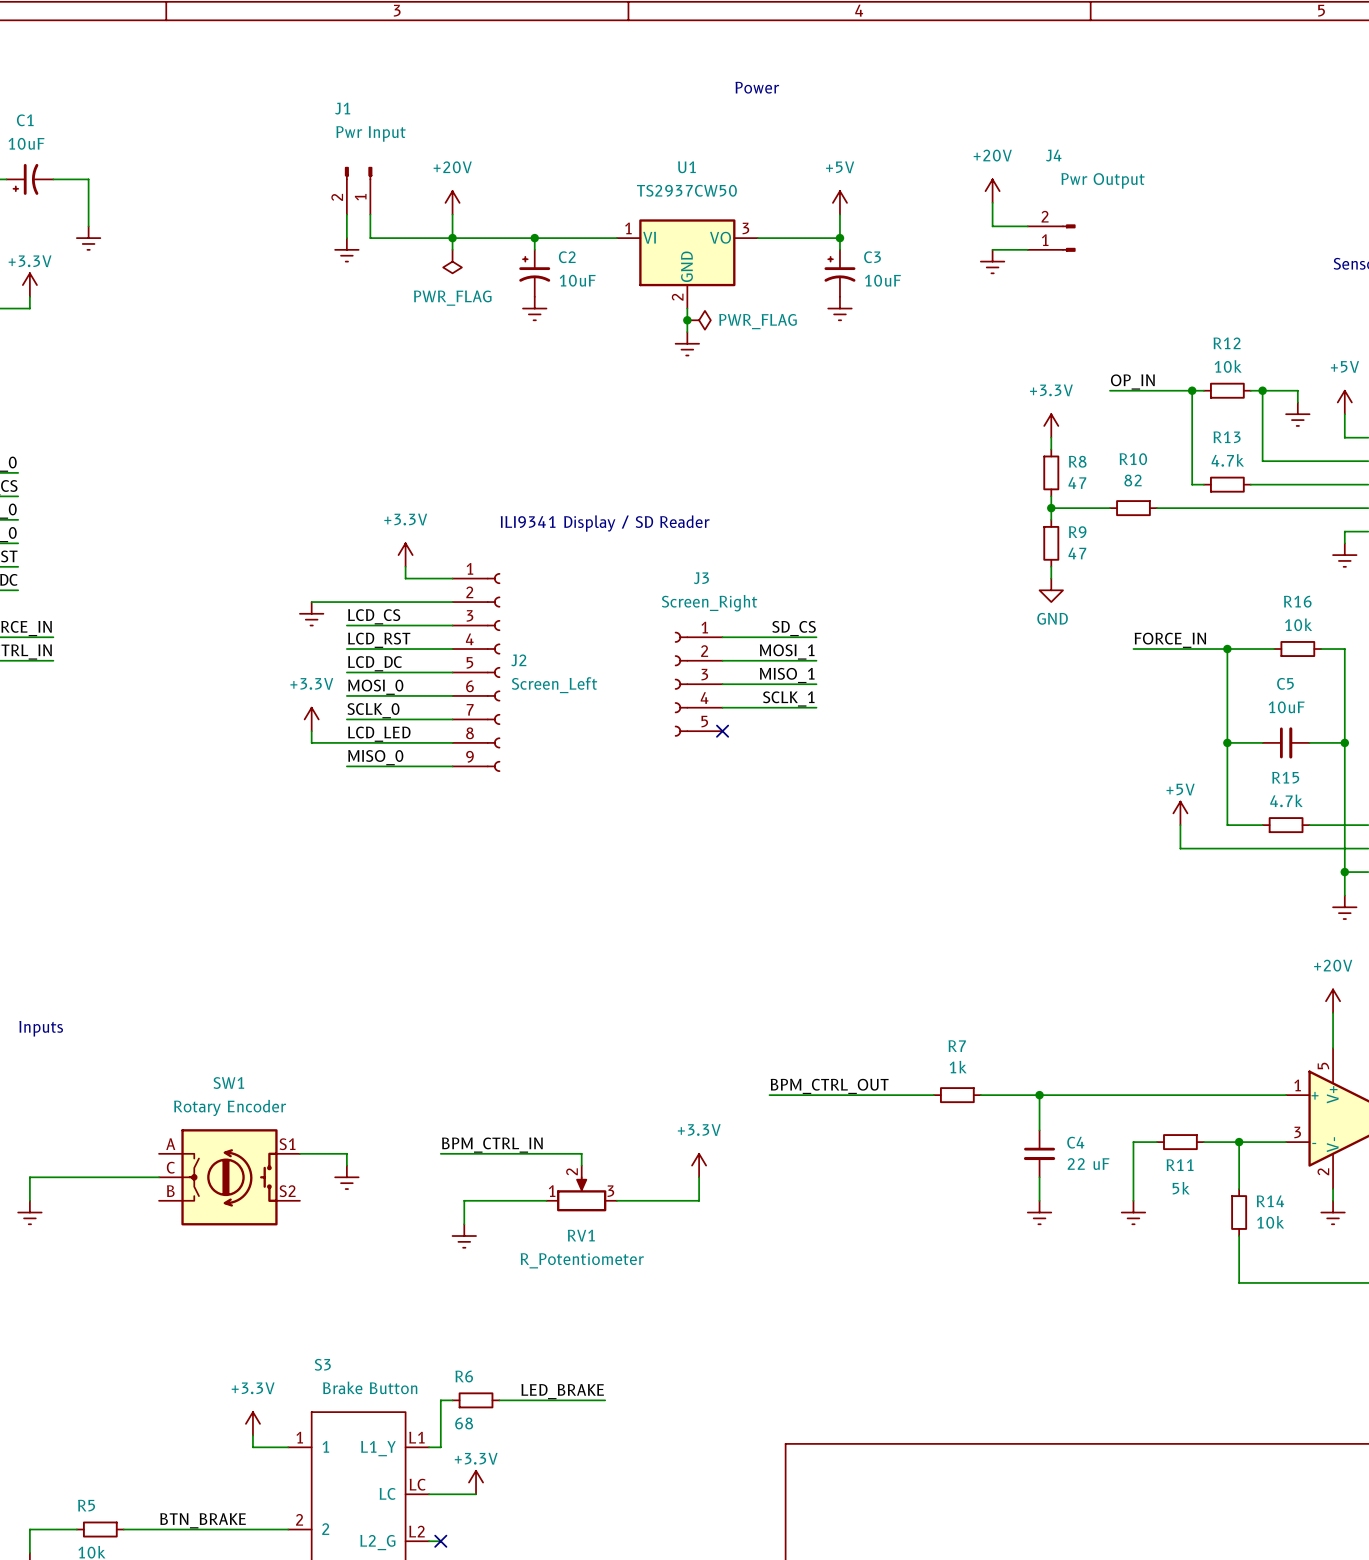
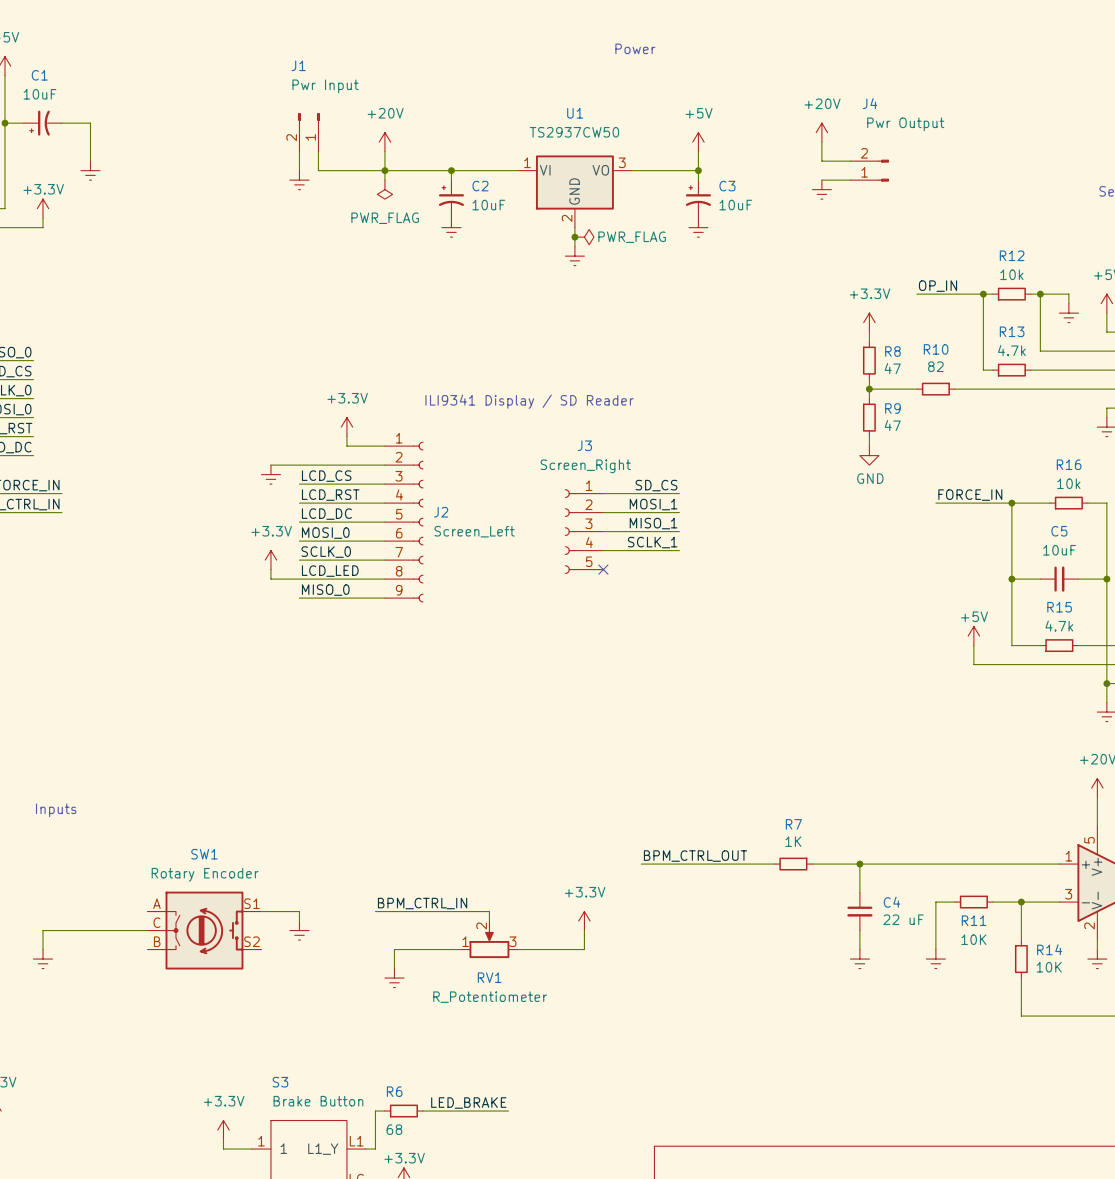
R7 value: 1k (958, 1067) -> 1K (793, 841)
R11 value: 5k (1181, 1188) -> 10K (973, 939)
R14 value: 10k (1270, 1222) -> 10K (1049, 967)

